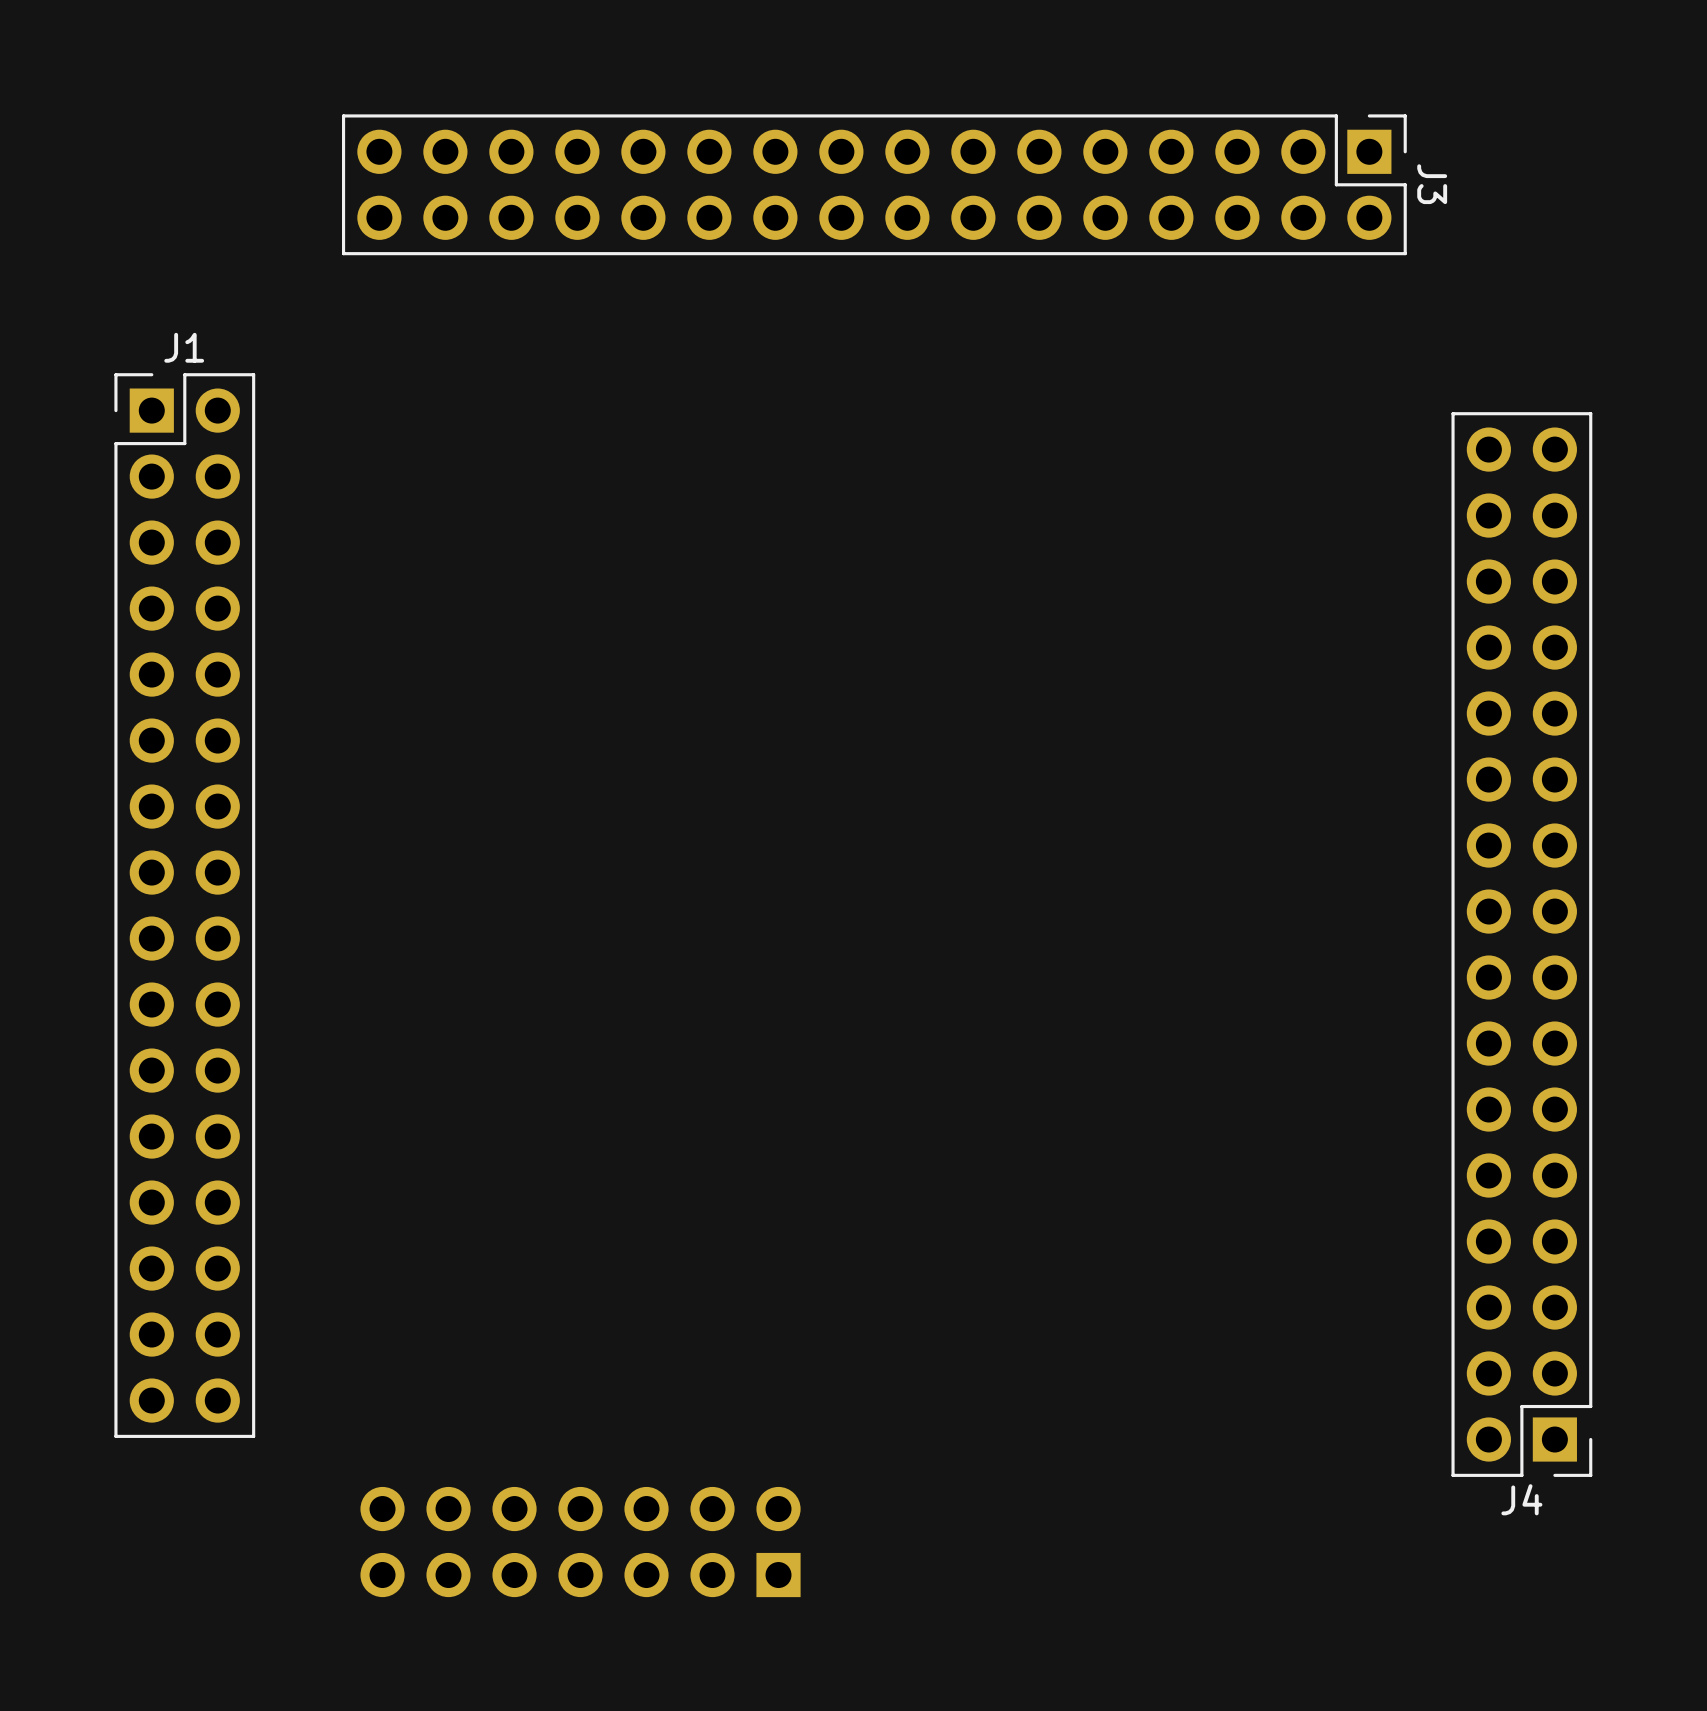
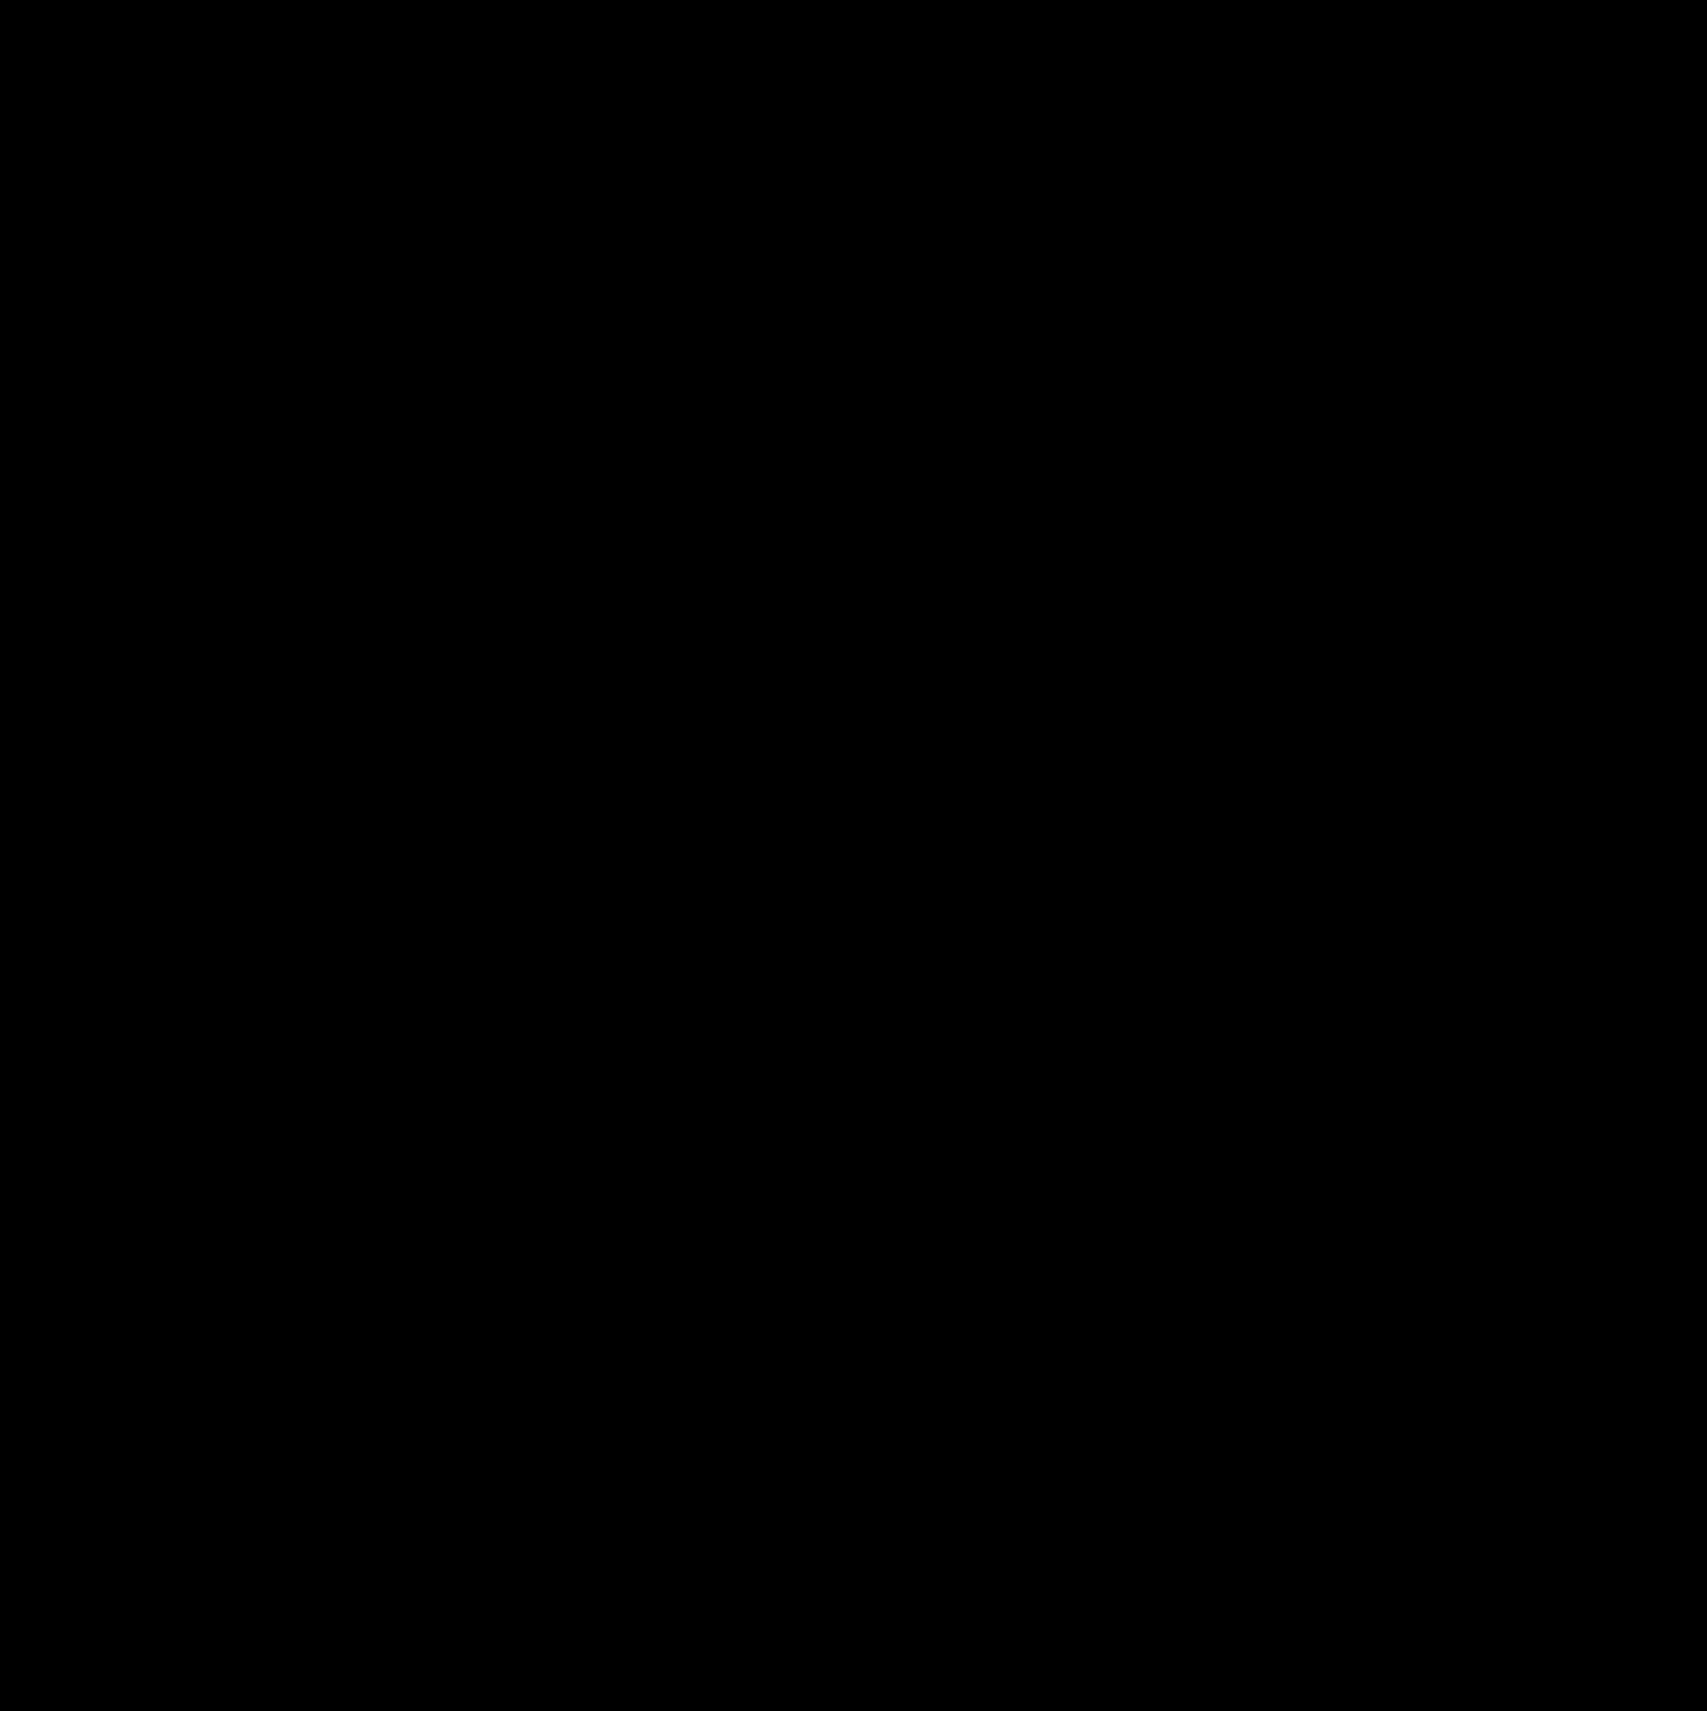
J3: (874, 184) -> none
J1: (184, 905) -> none
J4: (1521, 944) -> none
part: (580, 1542) -> none

